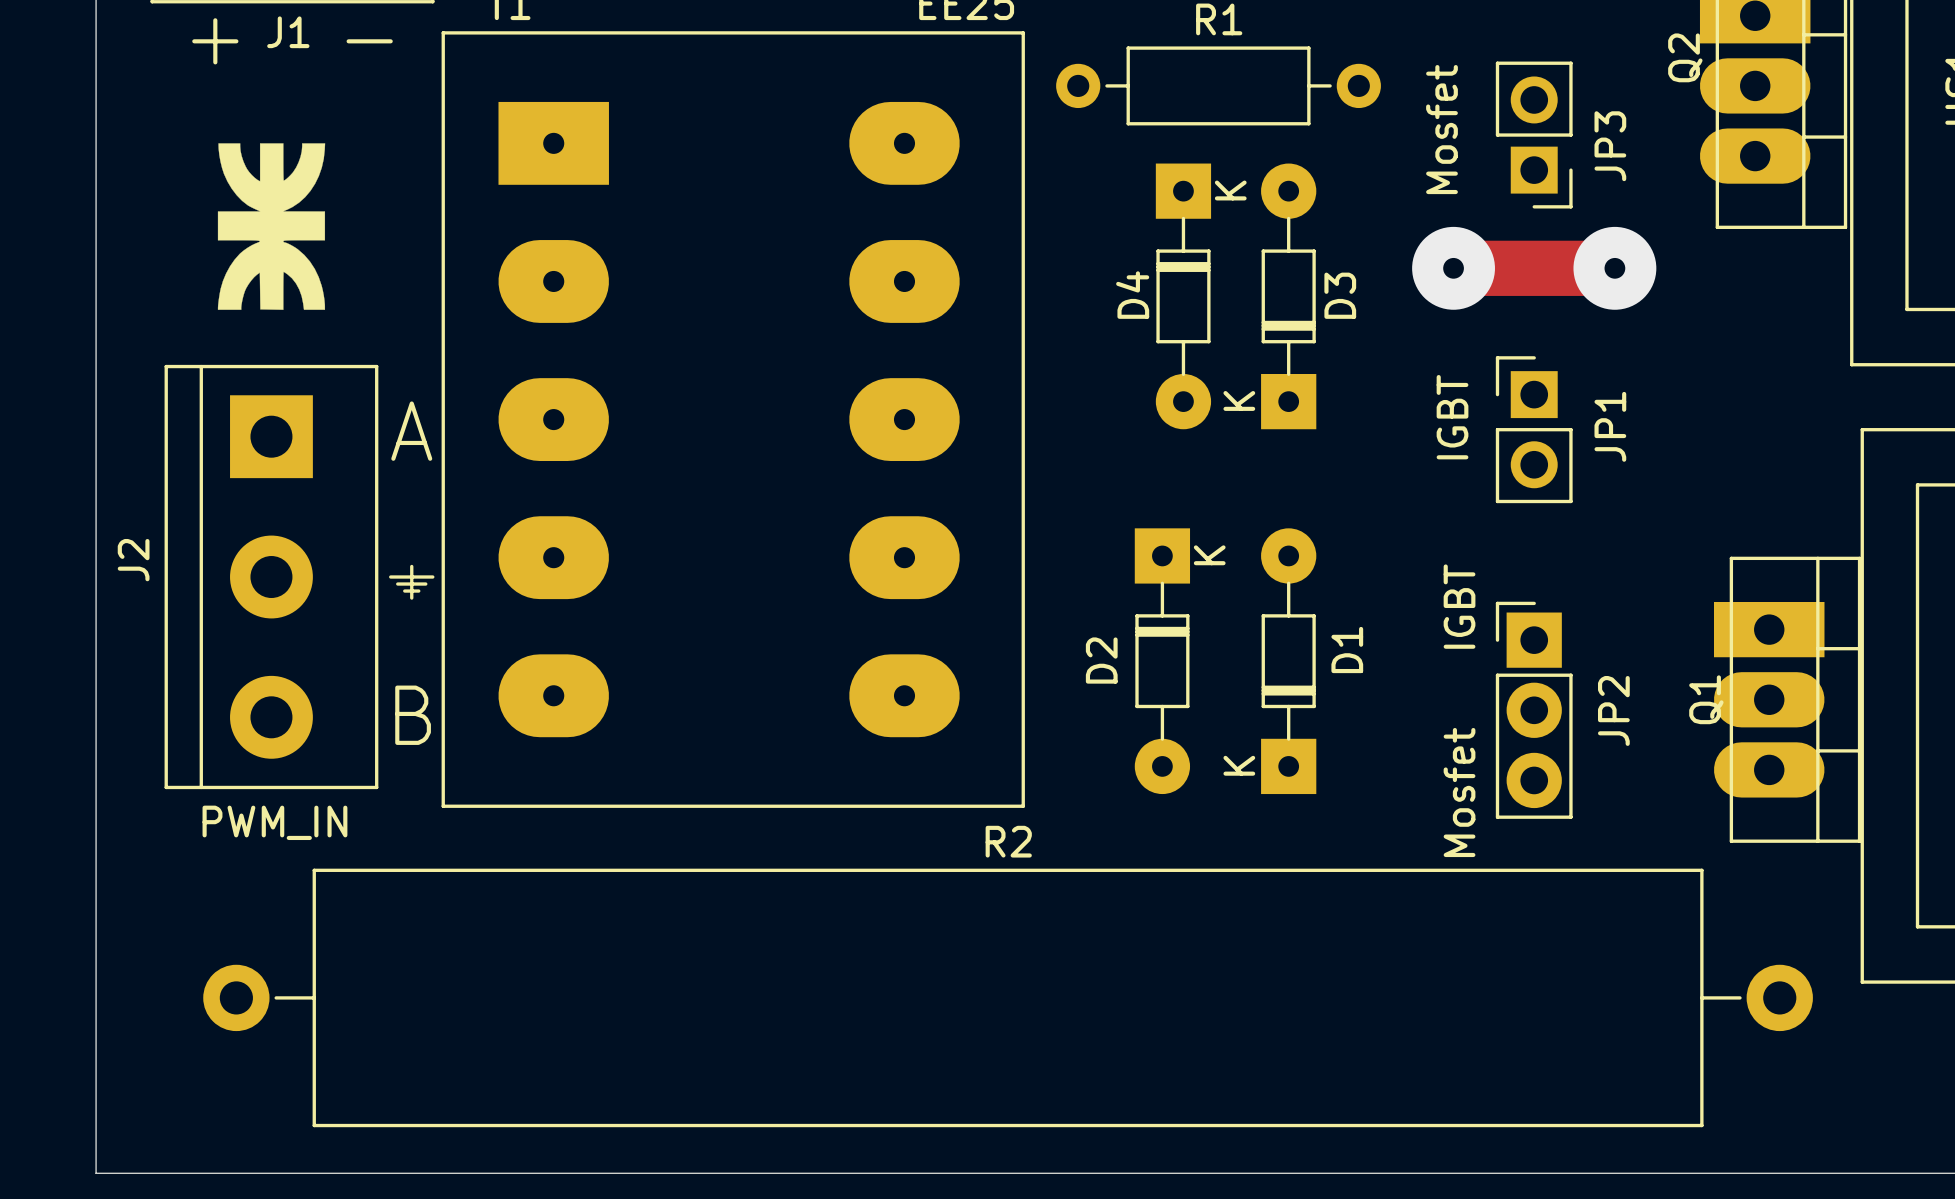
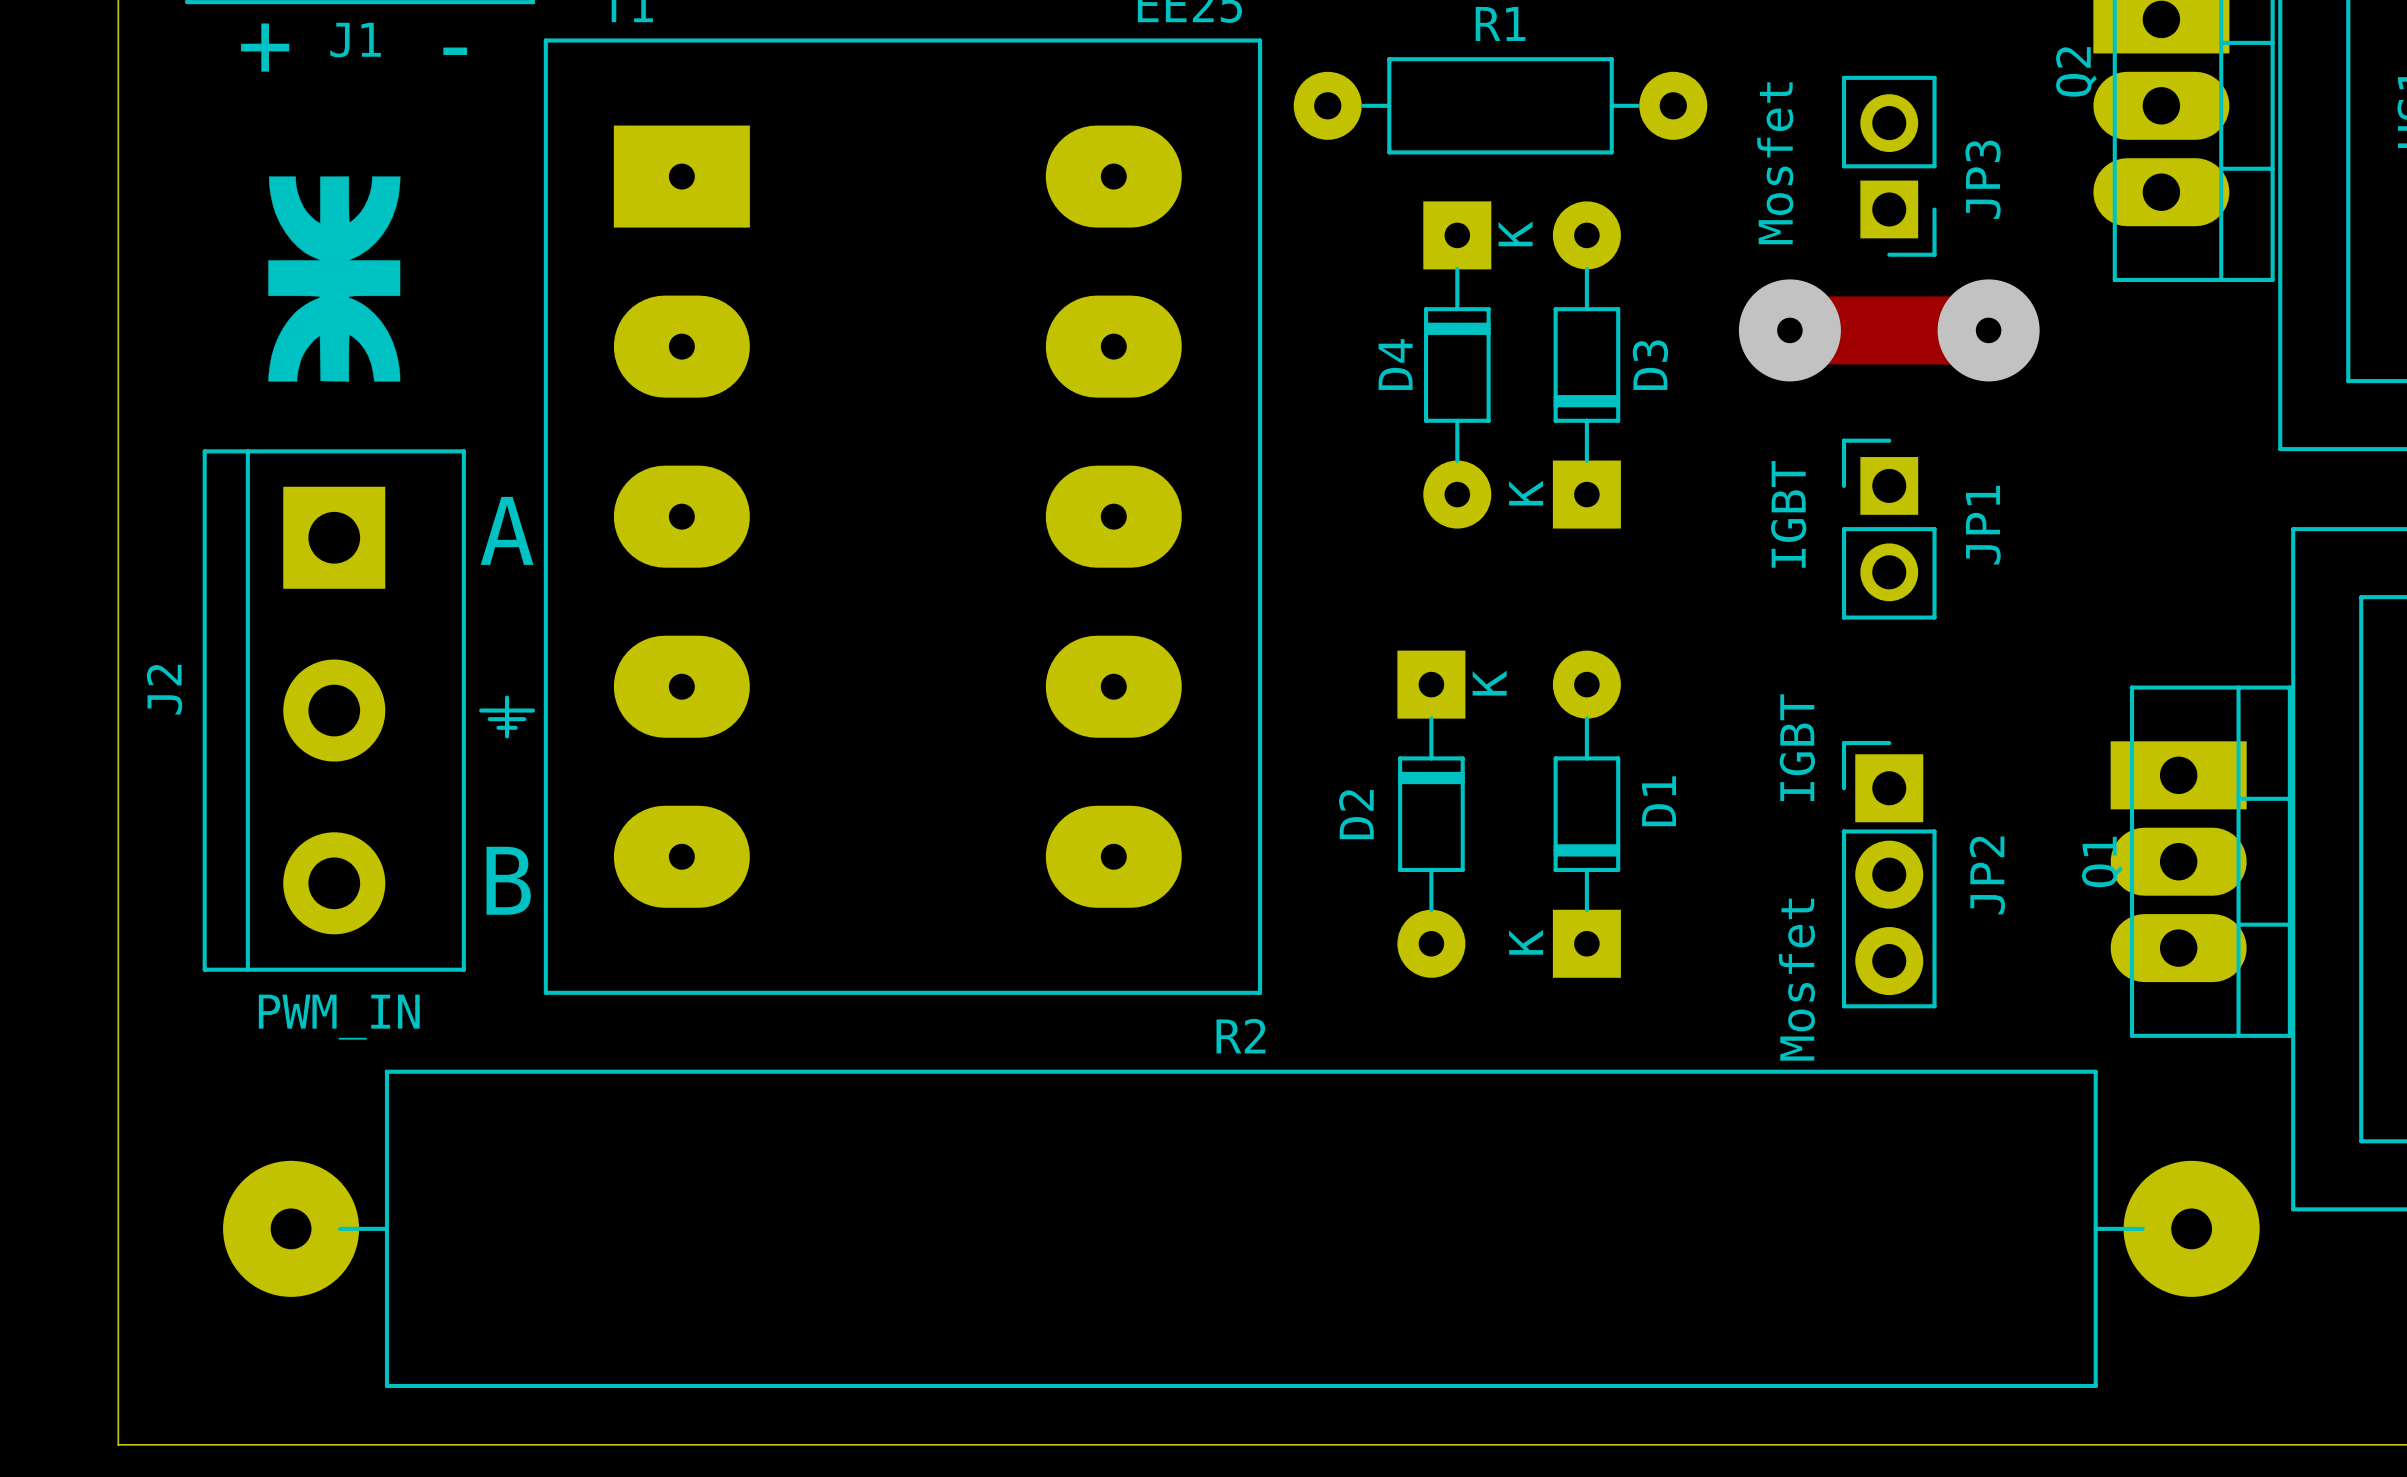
R1 footprint: [1056, 46, 1381, 126] -> [1293, 57, 1708, 155]
R2 footprint: [203, 868, 1813, 1128] -> [223, 1069, 2260, 1389]

